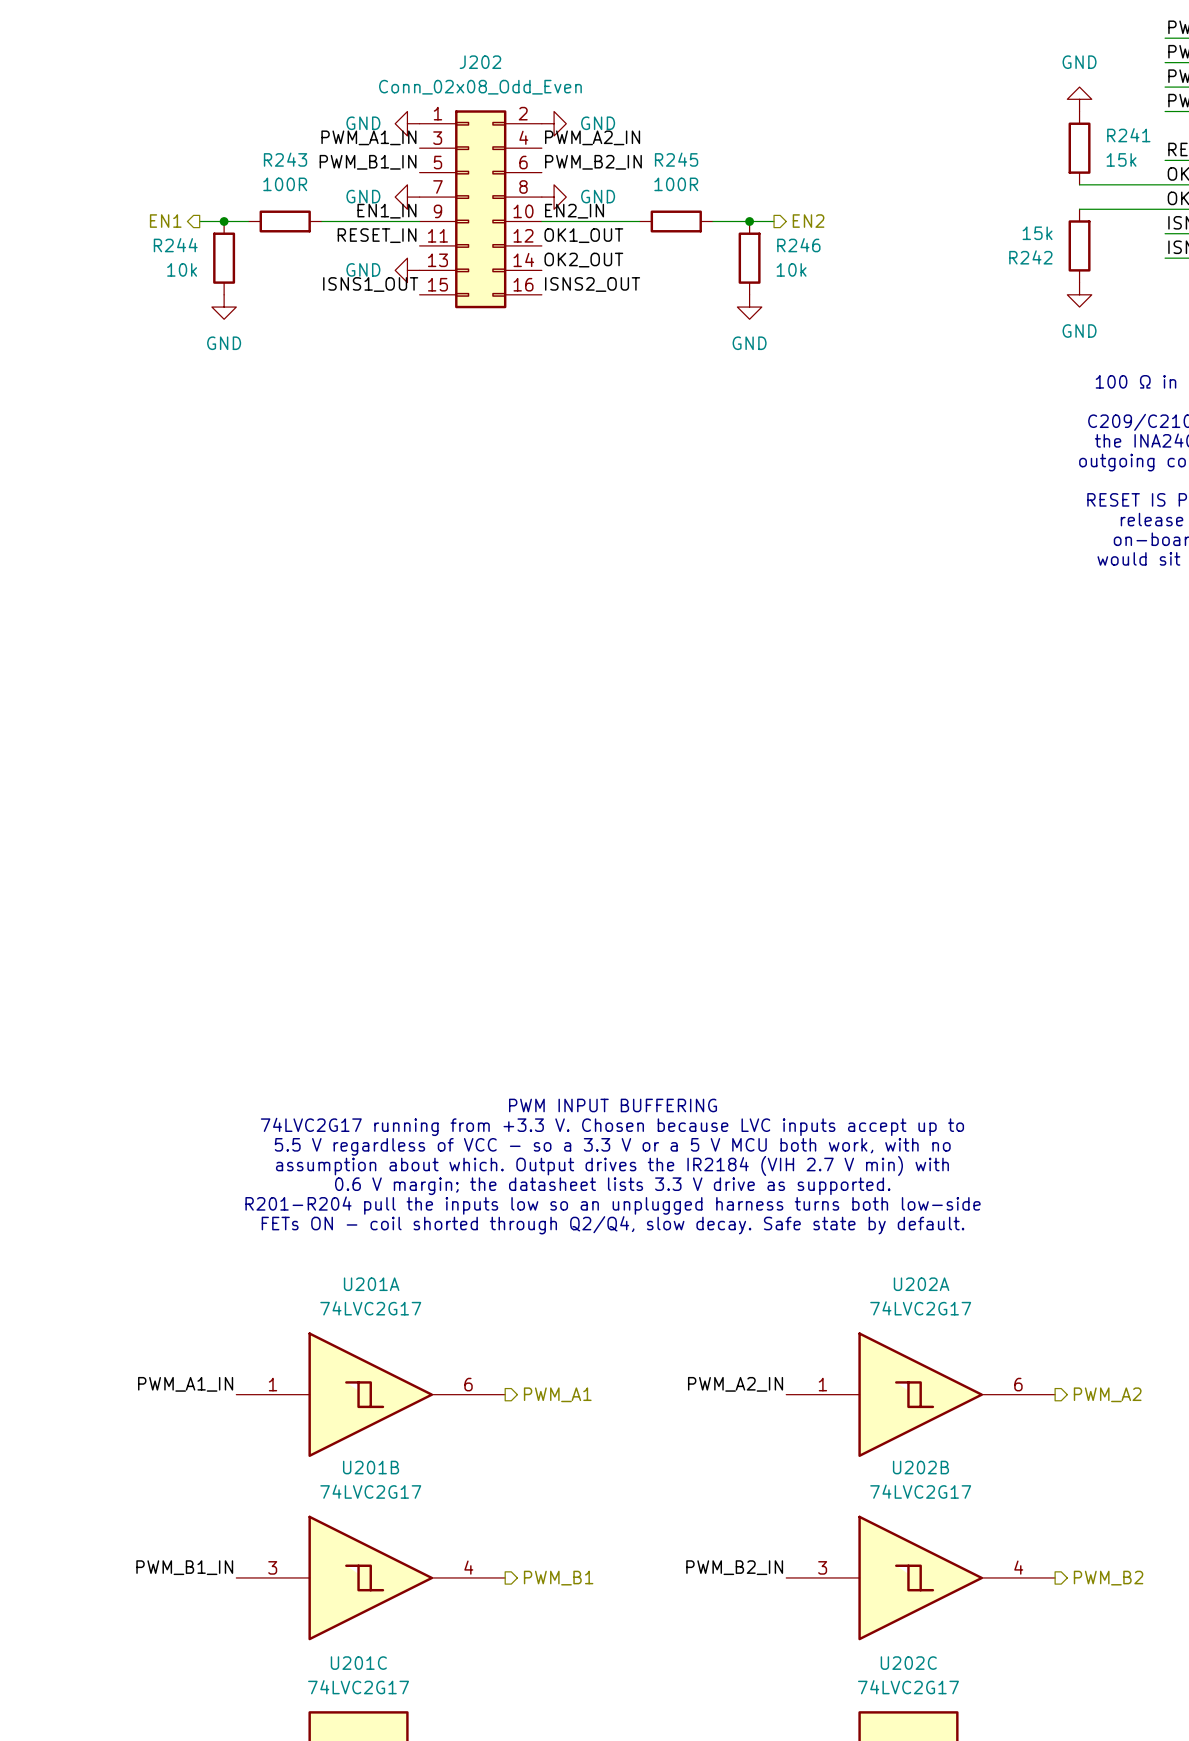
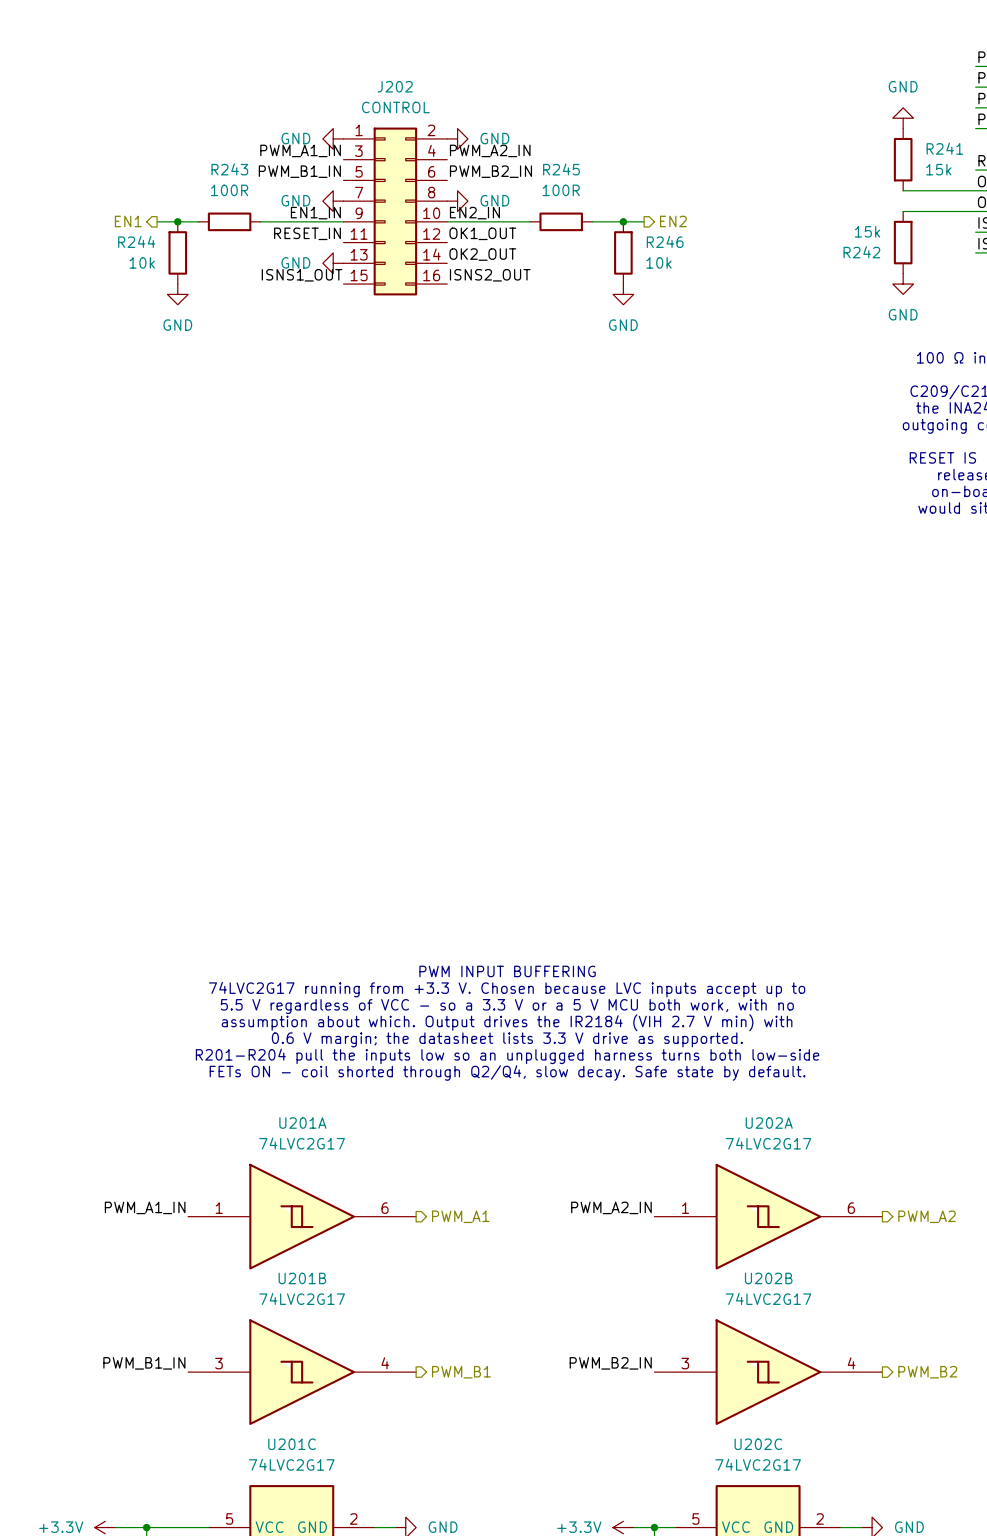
J202 value: Conn_02x08_Odd_Even (480, 87) -> CONTROL (395, 107)

